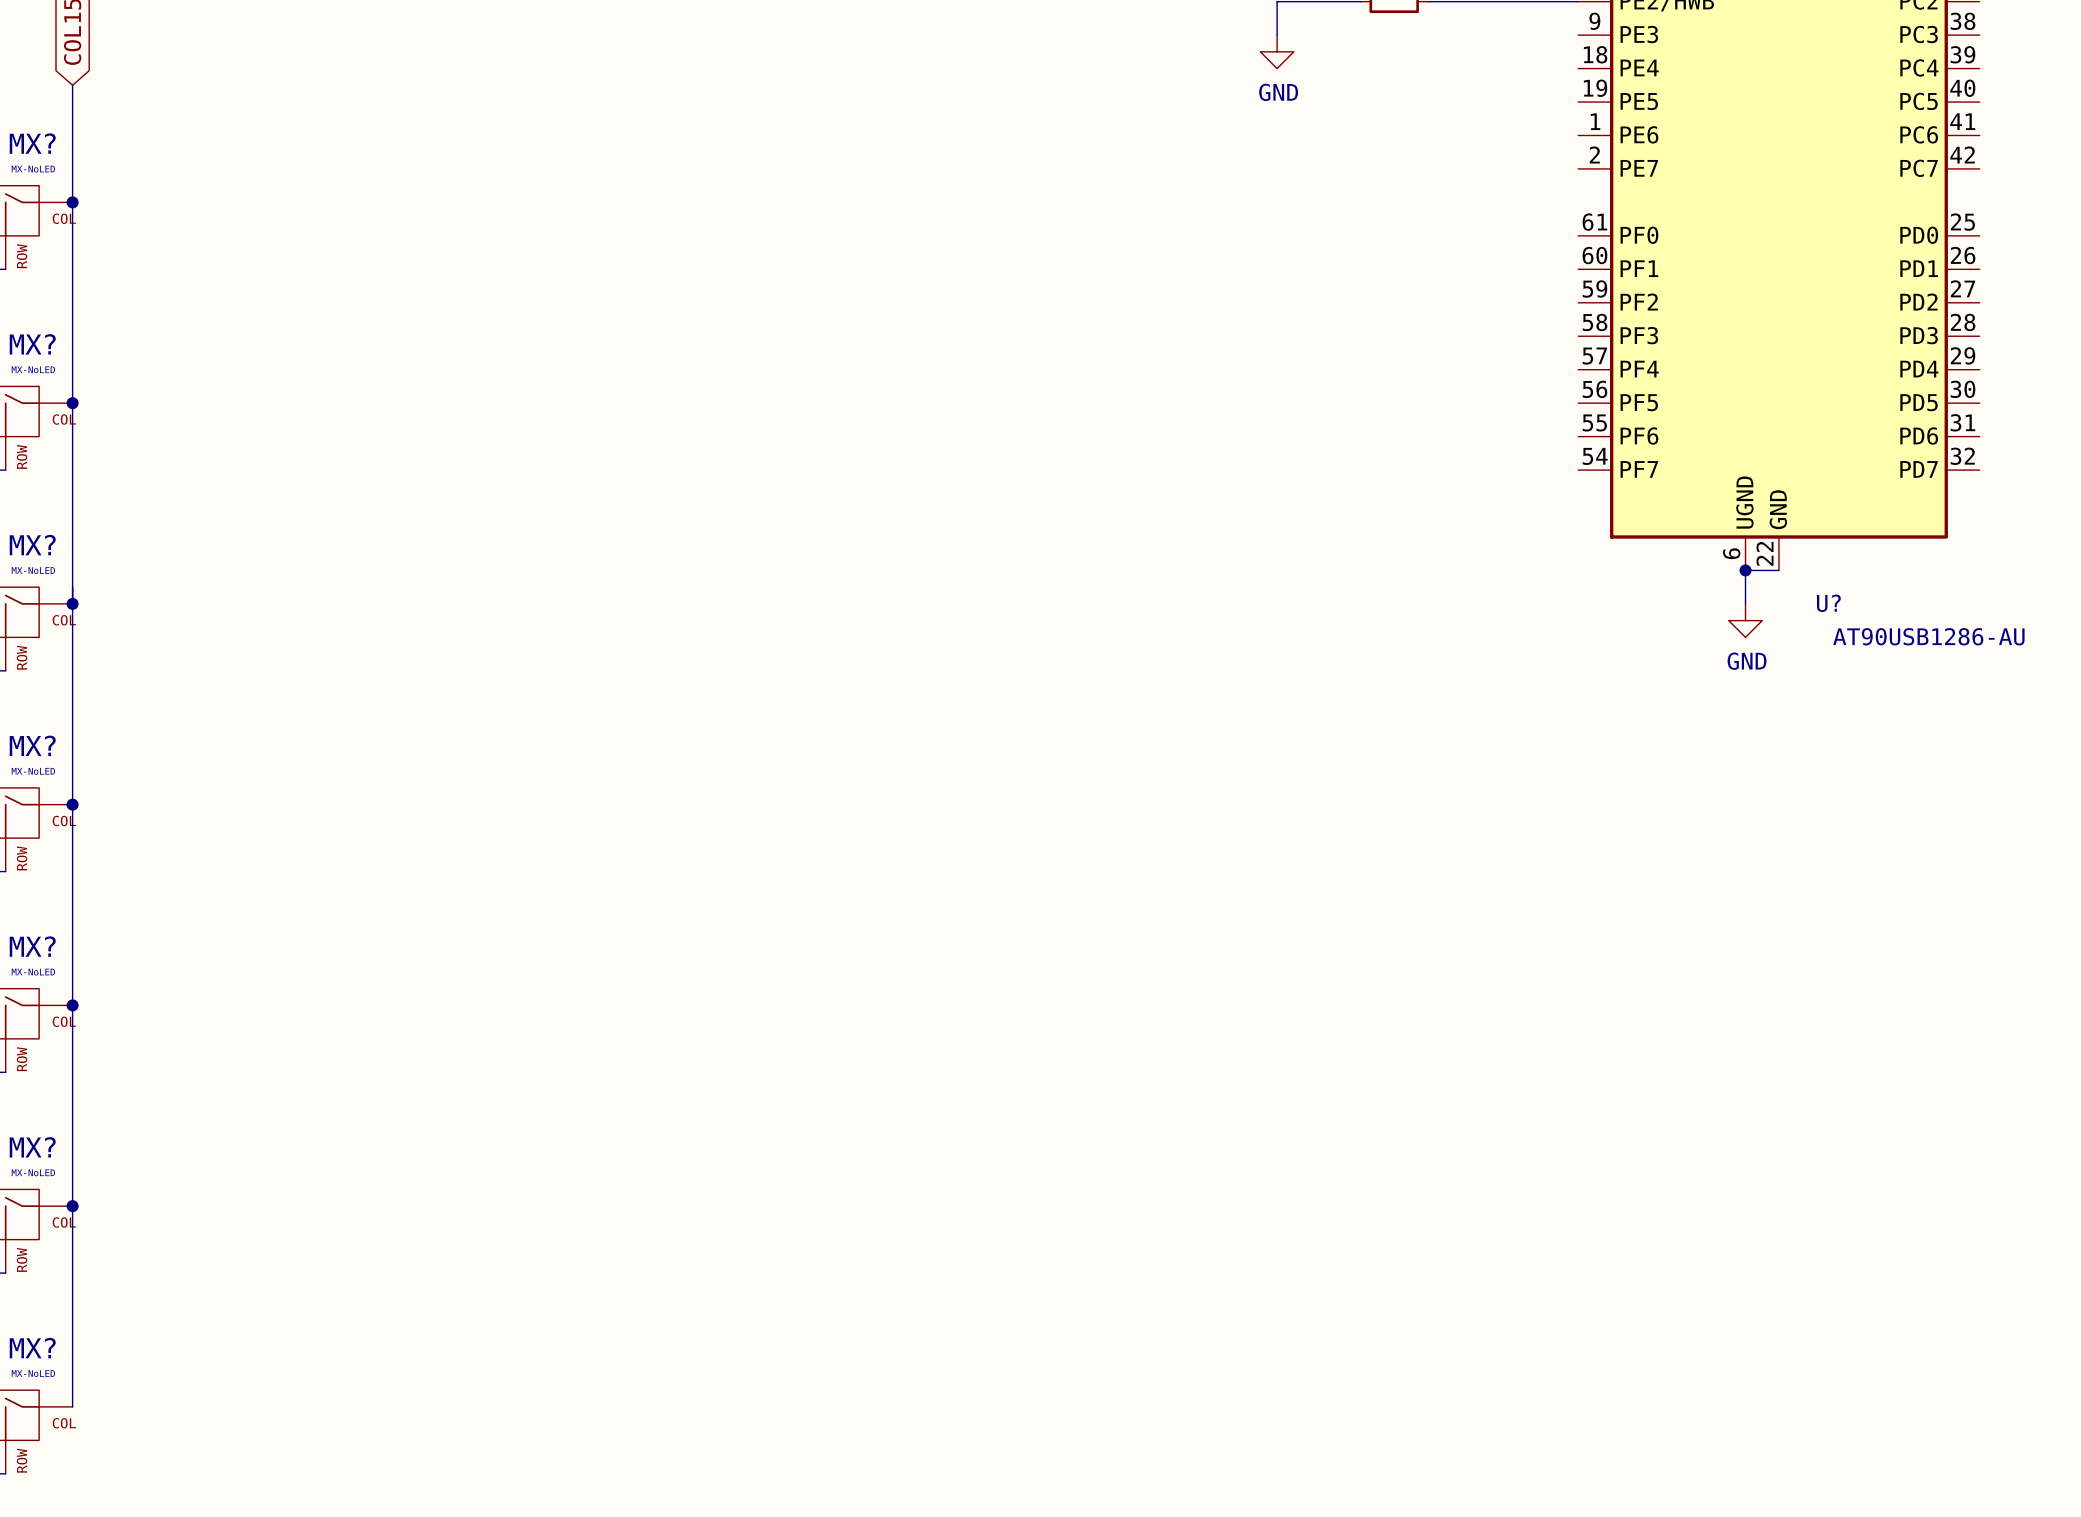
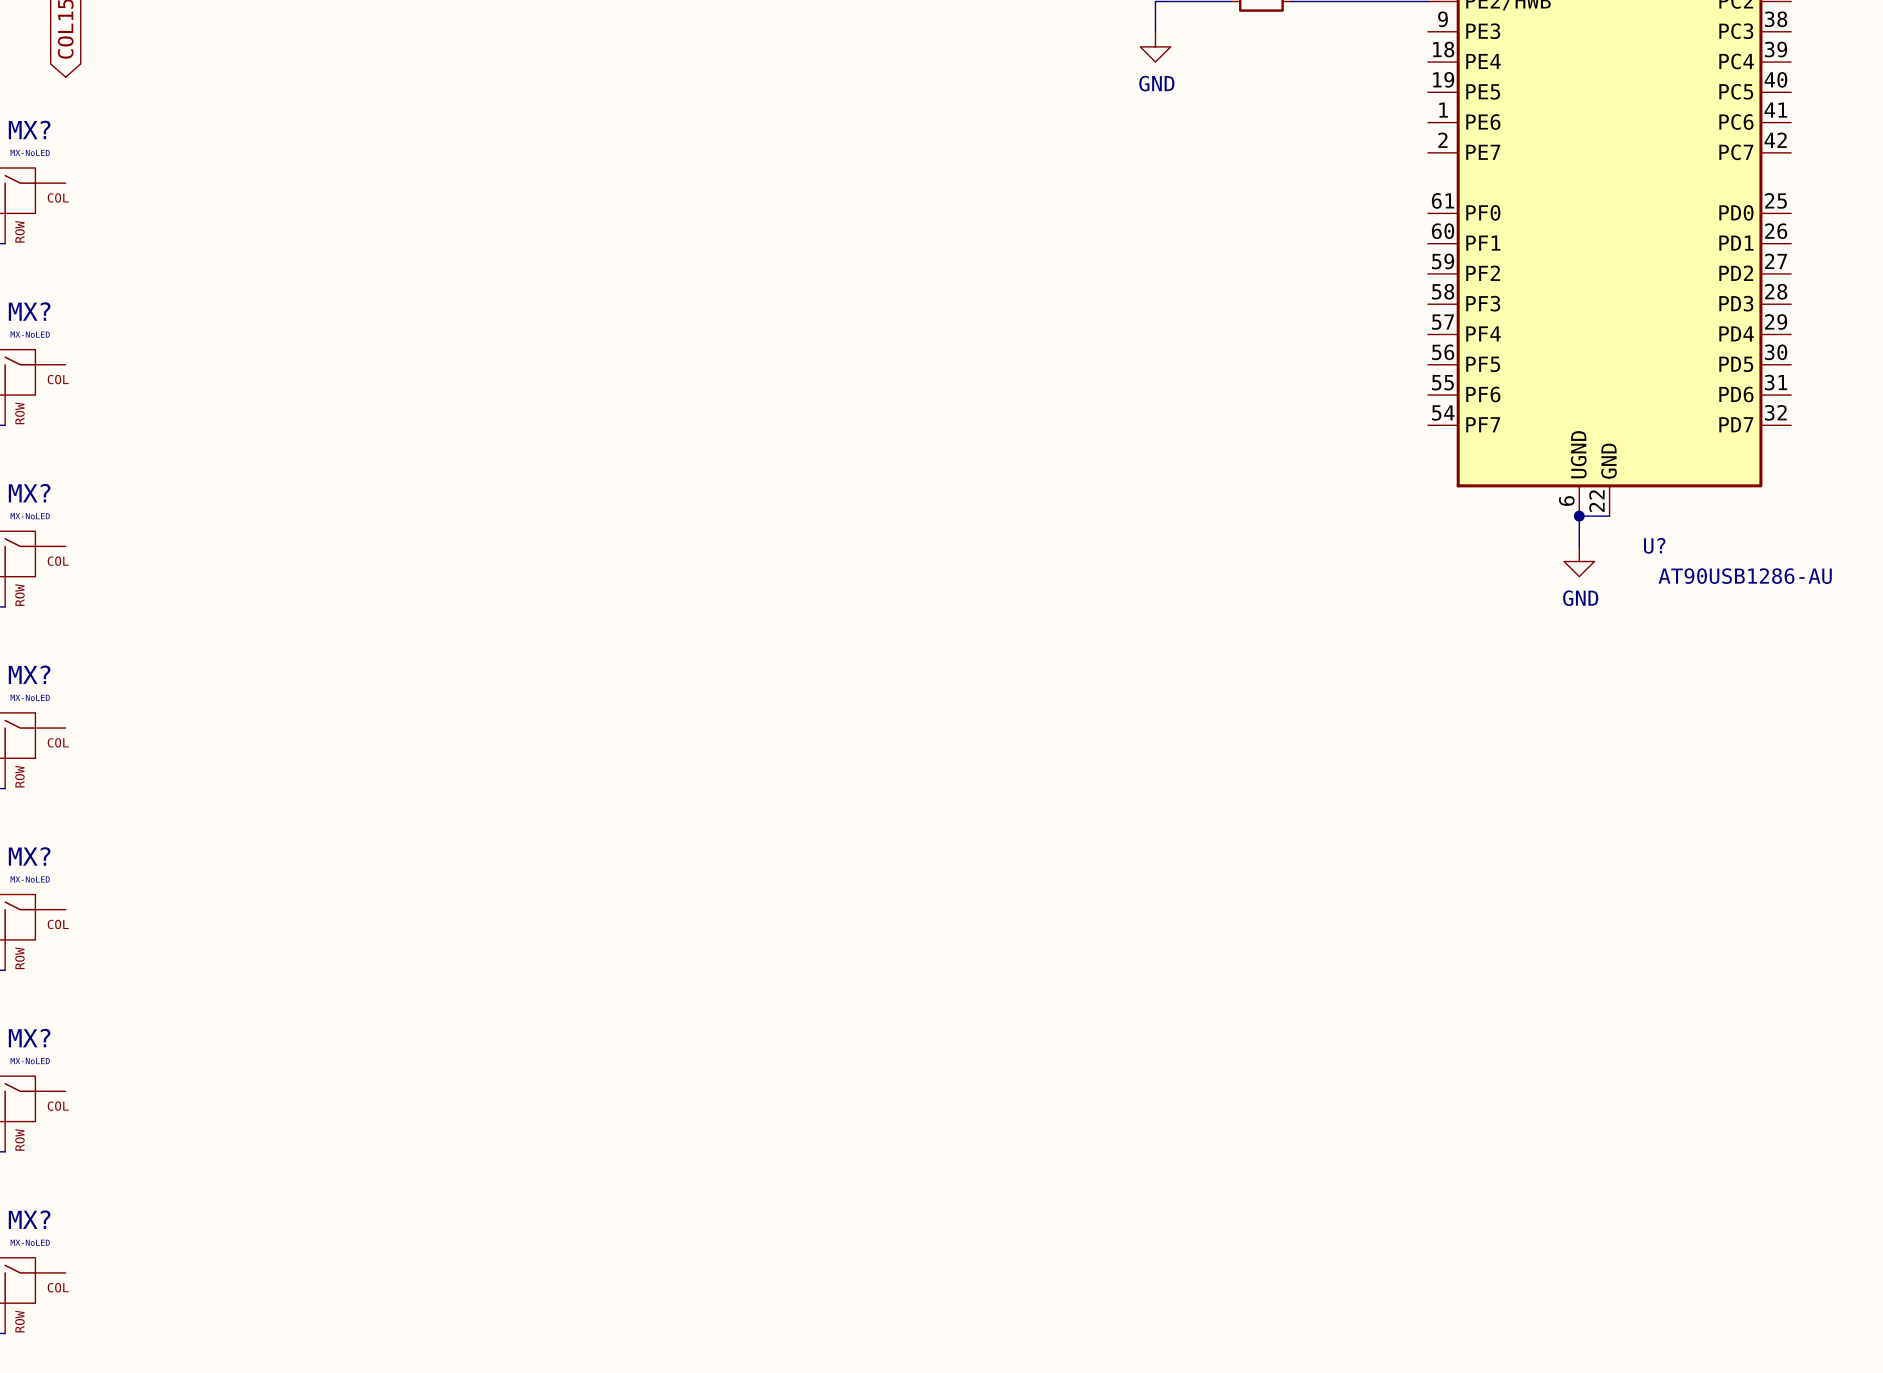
wire: (72, 85) (72, 1406) -> none
junction: (72, 202) -> none
junction: (72, 403) -> none
junction: (72, 603) -> none
junction: (72, 804) -> none
junction: (72, 1005) -> none
junction: (72, 1206) -> none

